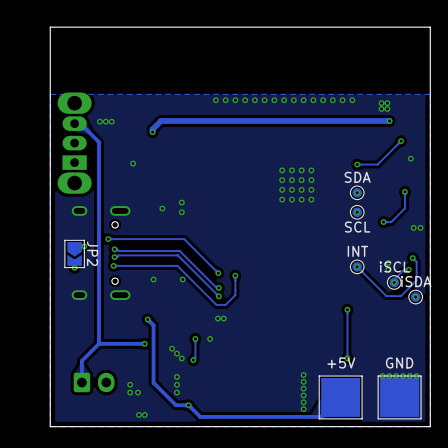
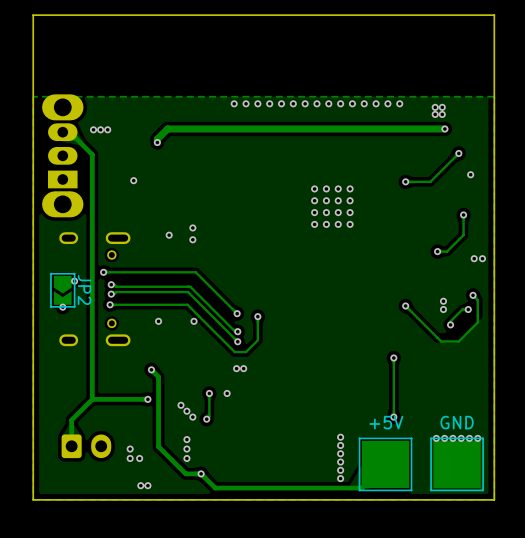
part: SDA (357, 192) -> none
via: (357, 192) -> none
part: SCL (357, 212) -> none
via: (357, 212) -> none
part: INT (357, 266) -> none
part: iSCL (394, 282) -> none
part: iSDA (415, 297) -> none
via: (415, 297) -> none

